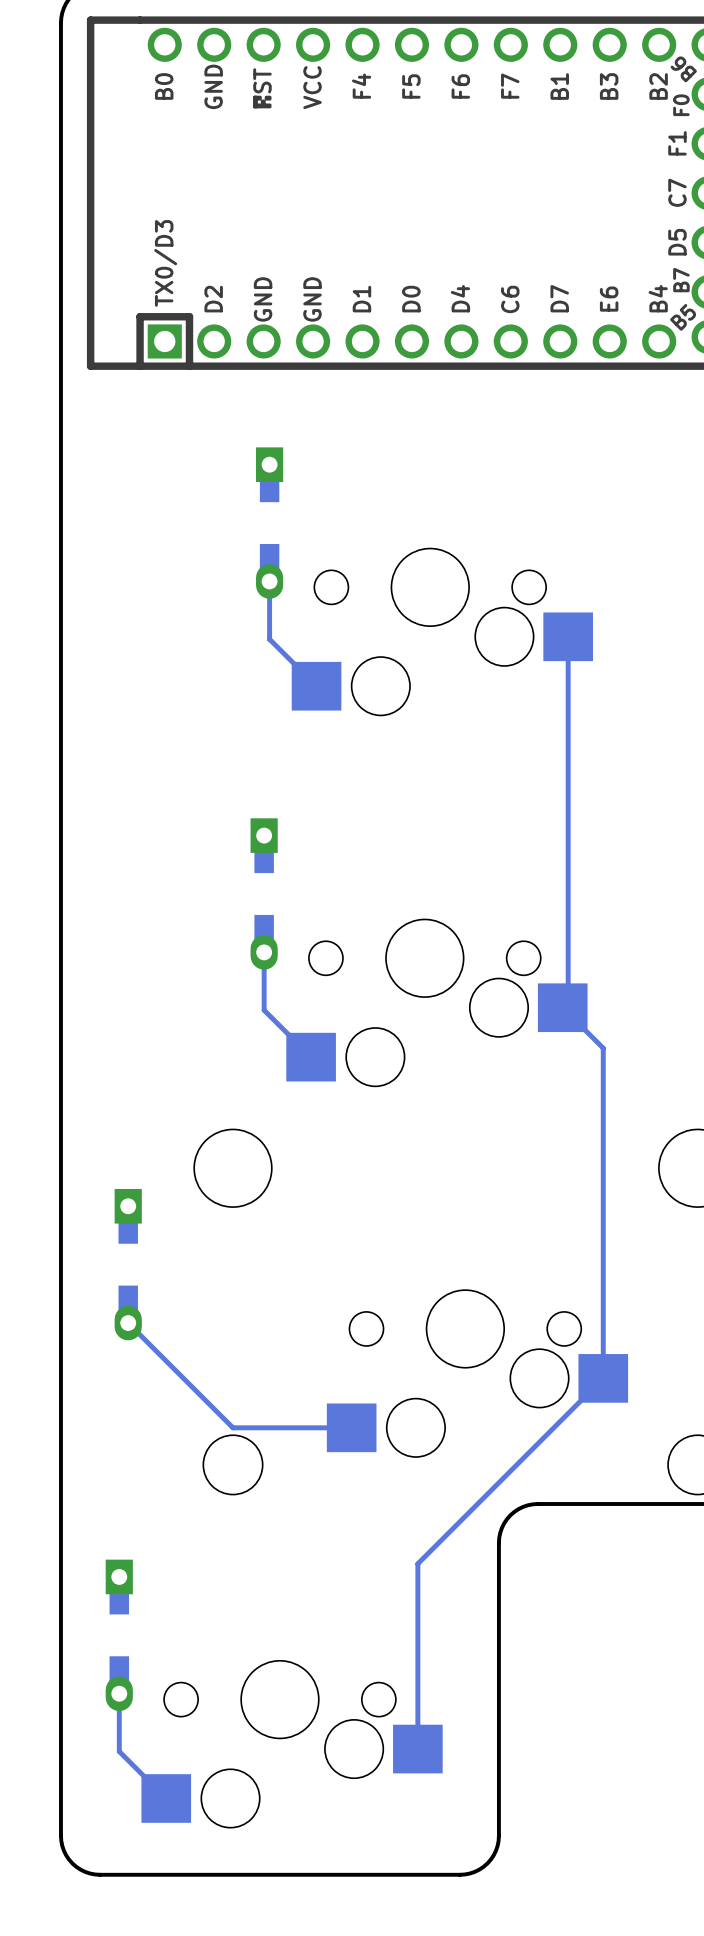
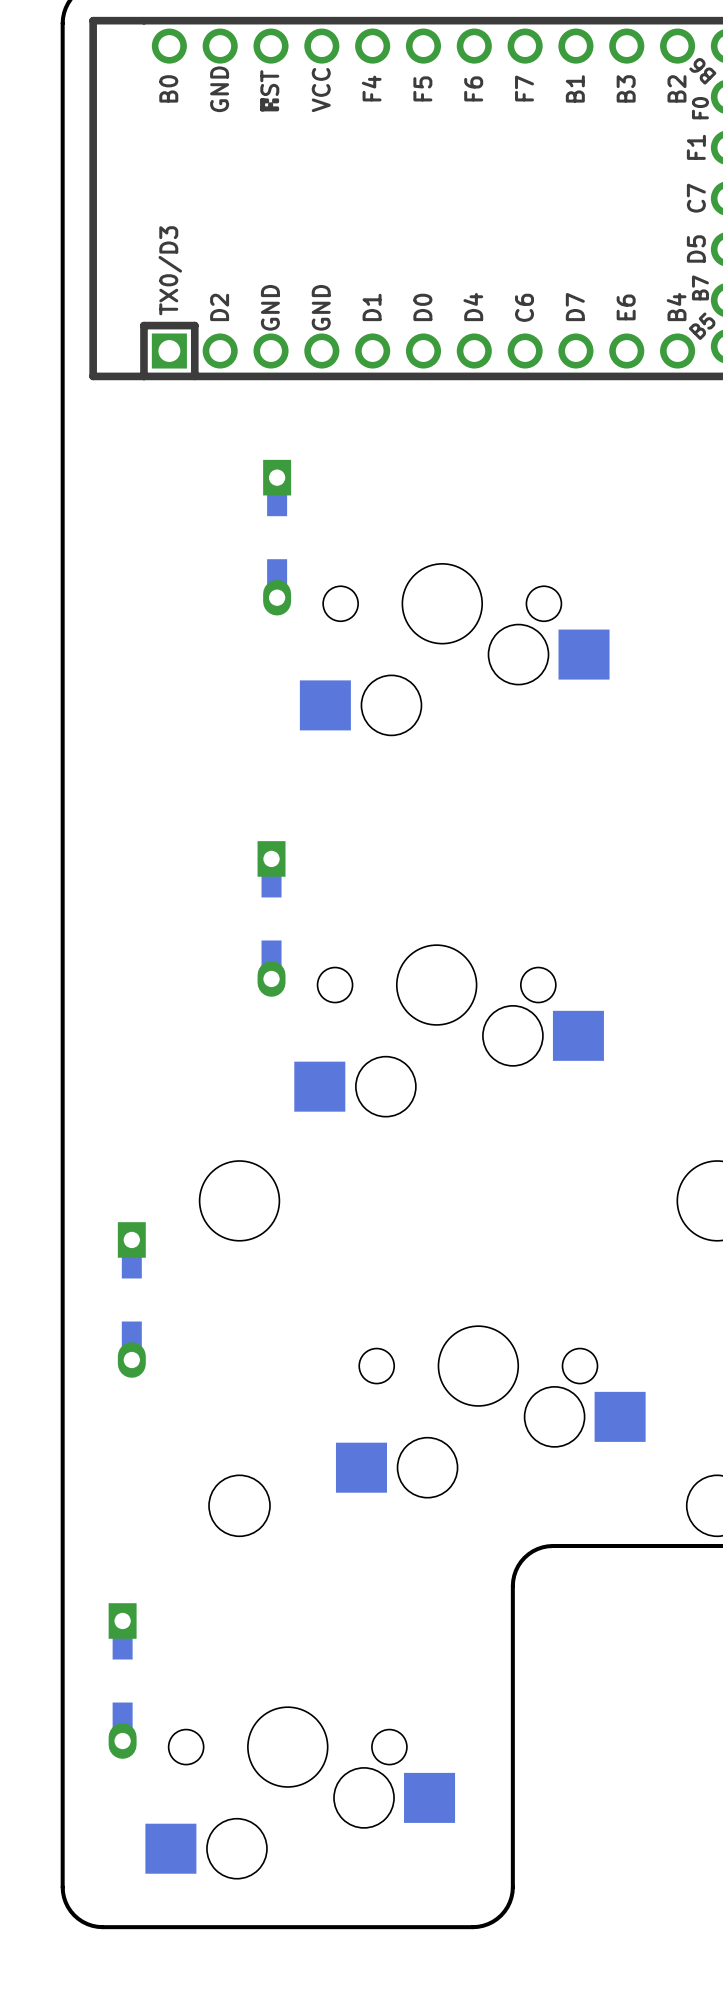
bottom track: (269, 557) (269, 639) (316, 686) -> none
bottom track: (568, 636) (568, 1002) (562, 1007) (603, 1048) (603, 1378) (417, 1563) (417, 1749) -> none
bottom track: (264, 928) (264, 1010) (311, 1057) -> none
bottom track: (128, 1299) (128, 1323) (232, 1427) (351, 1427) -> none
bottom track: (119, 1669) (119, 1751) (166, 1798) -> none

